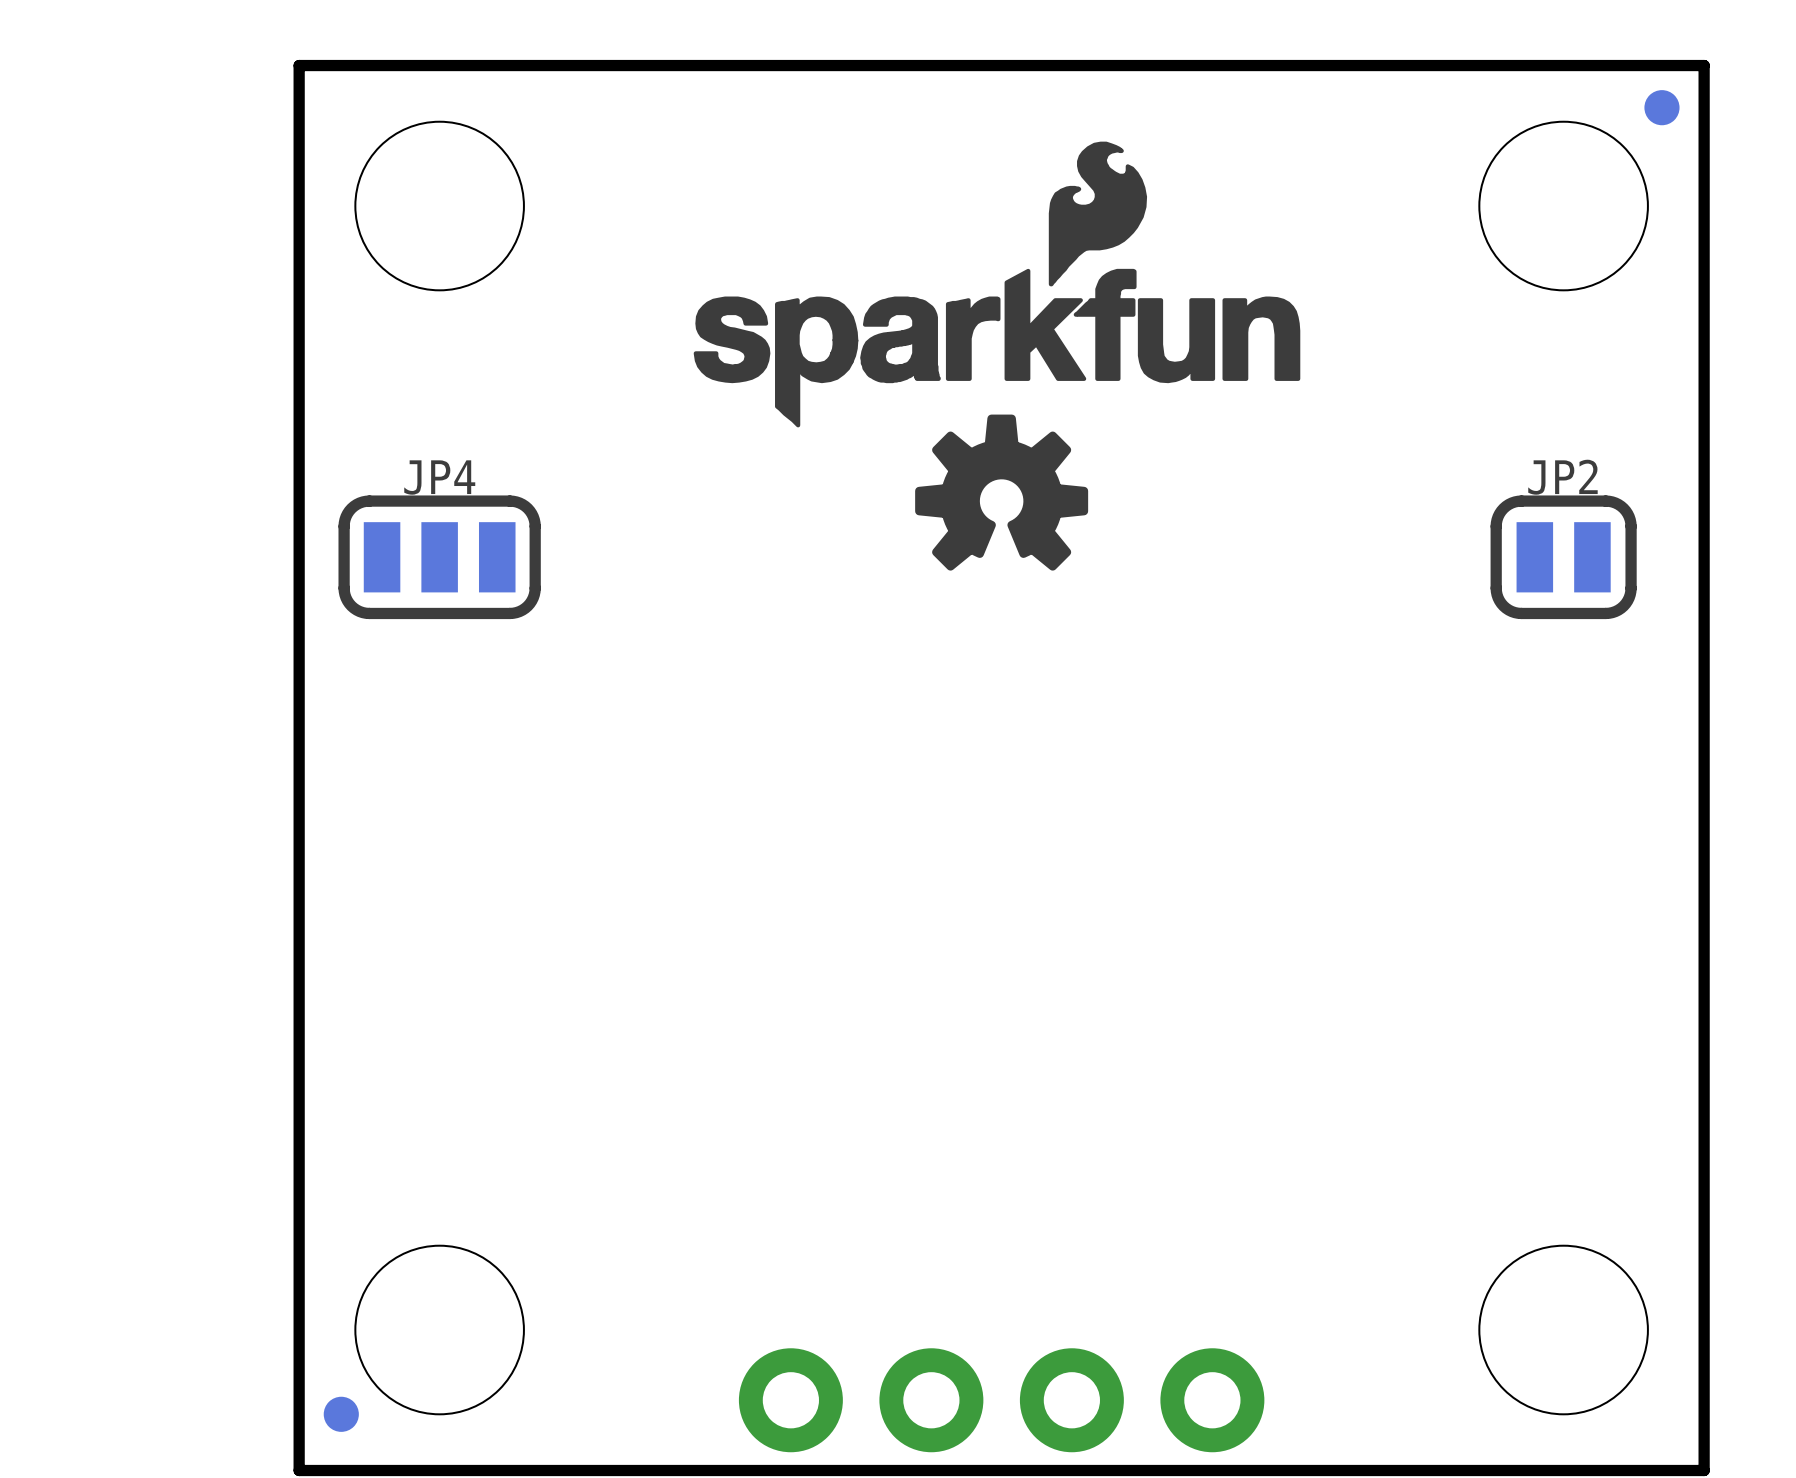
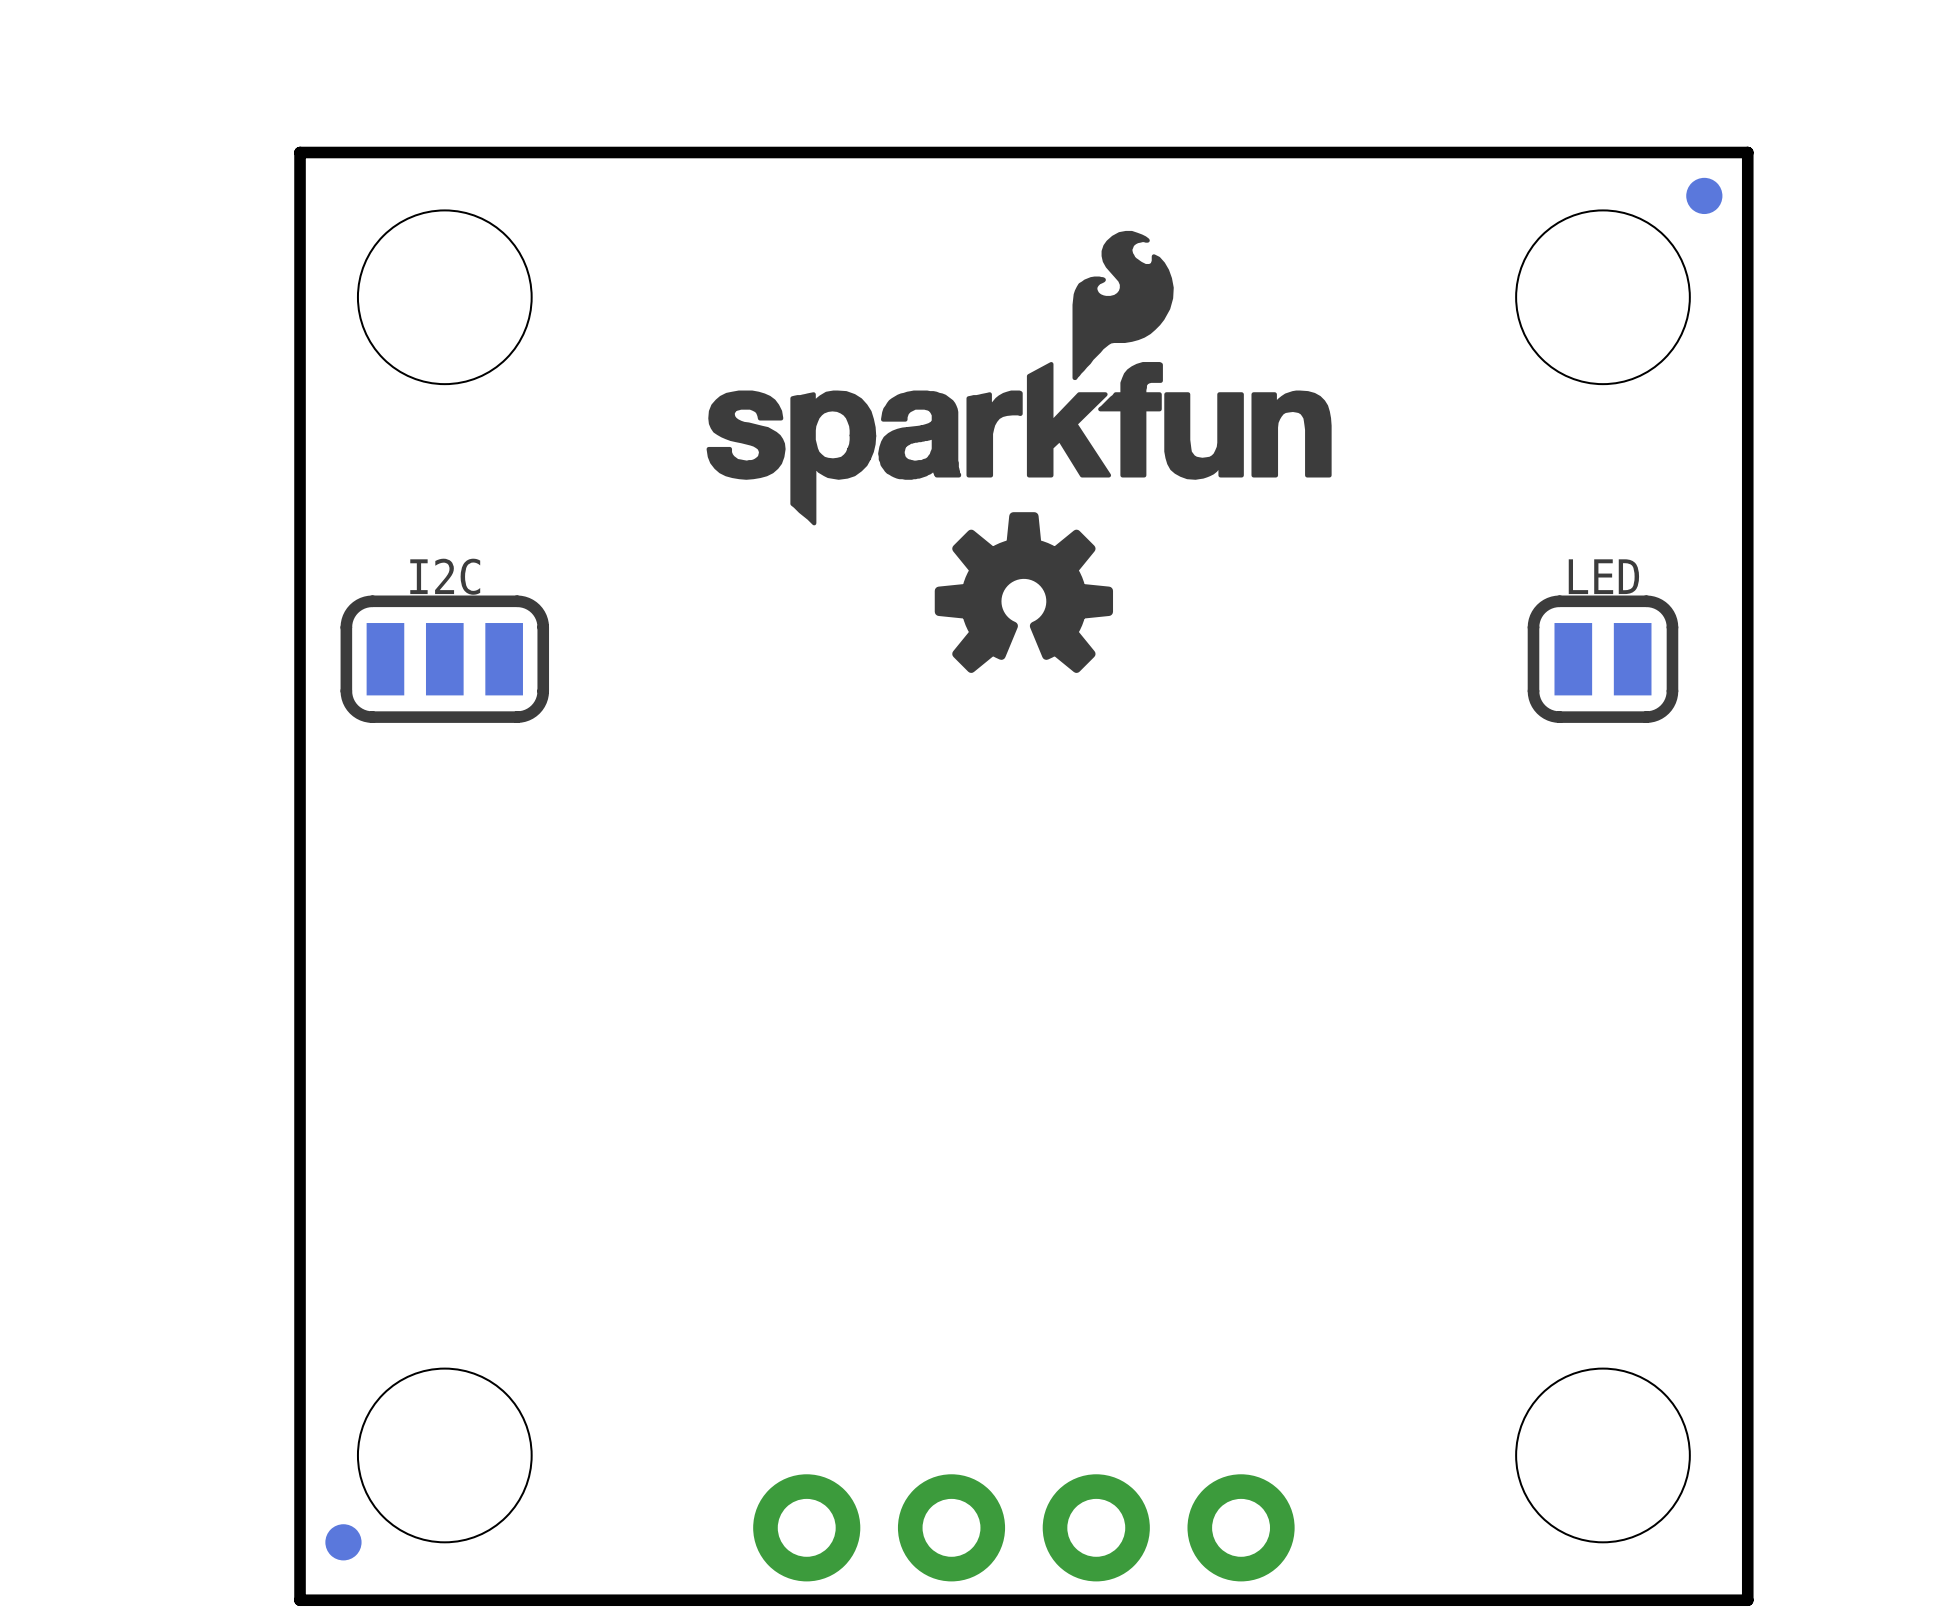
JP4 name: JP4 (439, 477) -> I2C (445, 576)
JP2 name: JP2 (1562, 477) -> LED (1603, 576)

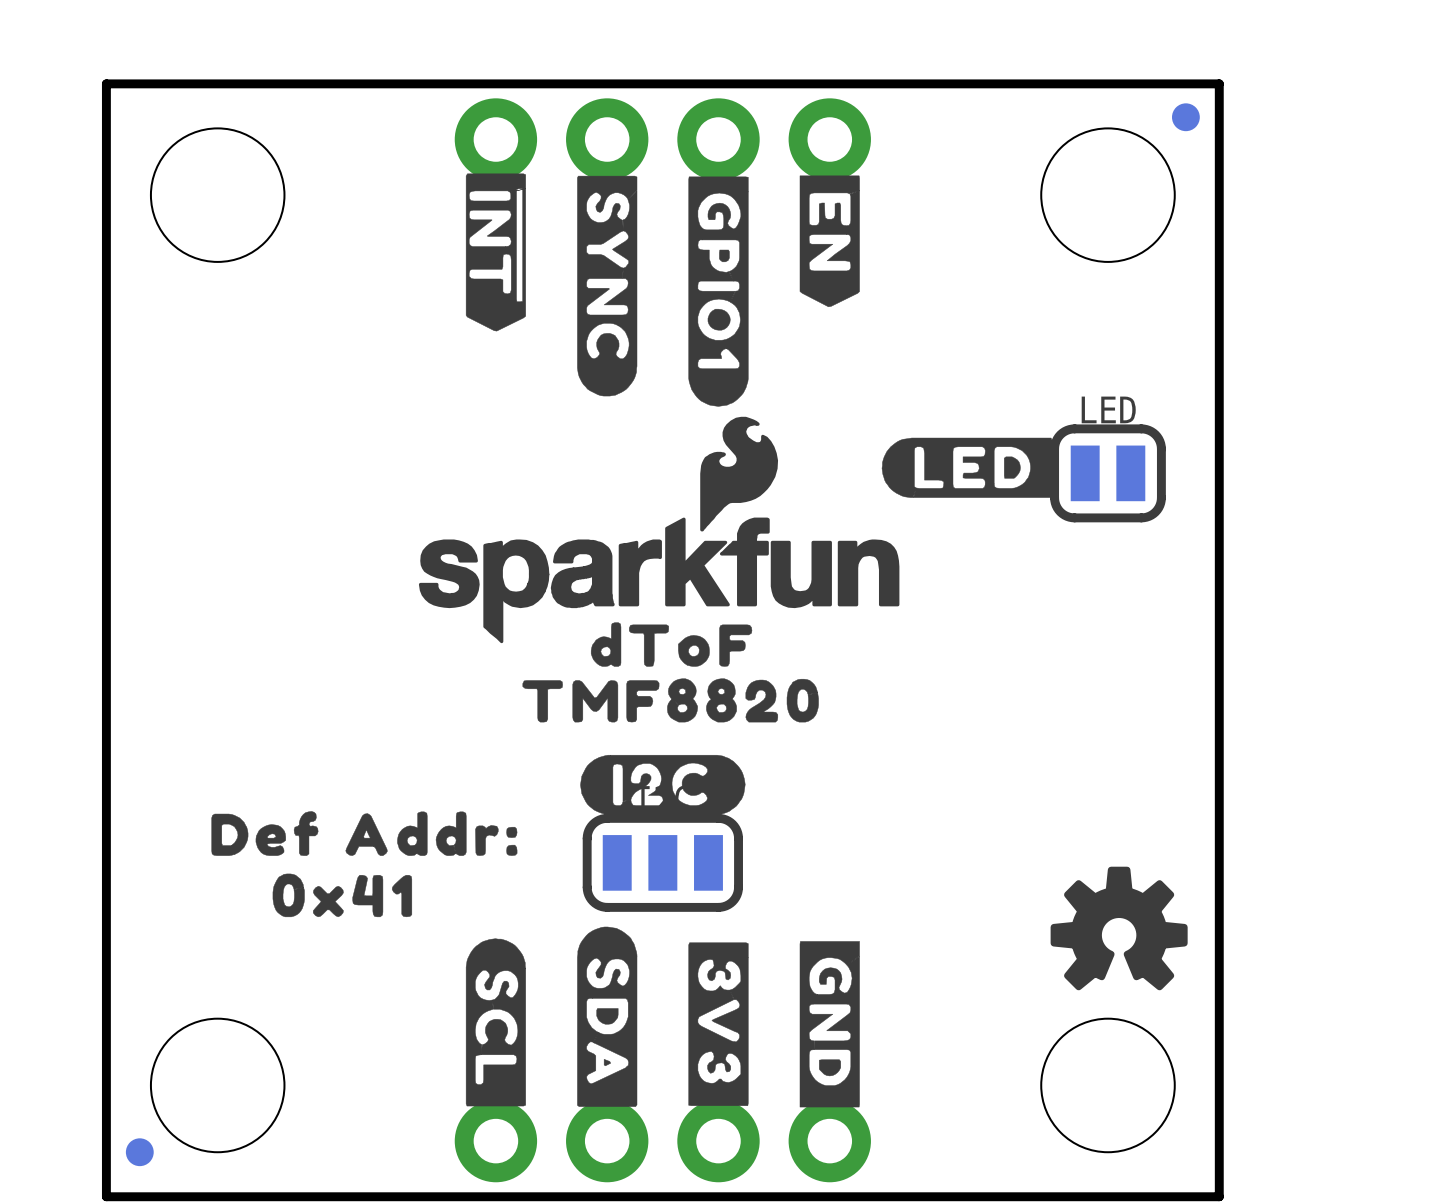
part: none -> (662, 139)
drawing: none -> [465, 173, 860, 407]
drawing position: (1019, 378) -> (659, 529)
drawing position: (1023, 592) -> (1119, 928)
drawing: none -> [881, 437, 1053, 498]
I2C position: (444, 659) -> (662, 862)
drawing: none -> [522, 622, 819, 815]
drawing: none -> [211, 811, 518, 918]
drawing: none -> [465, 926, 860, 1108]

